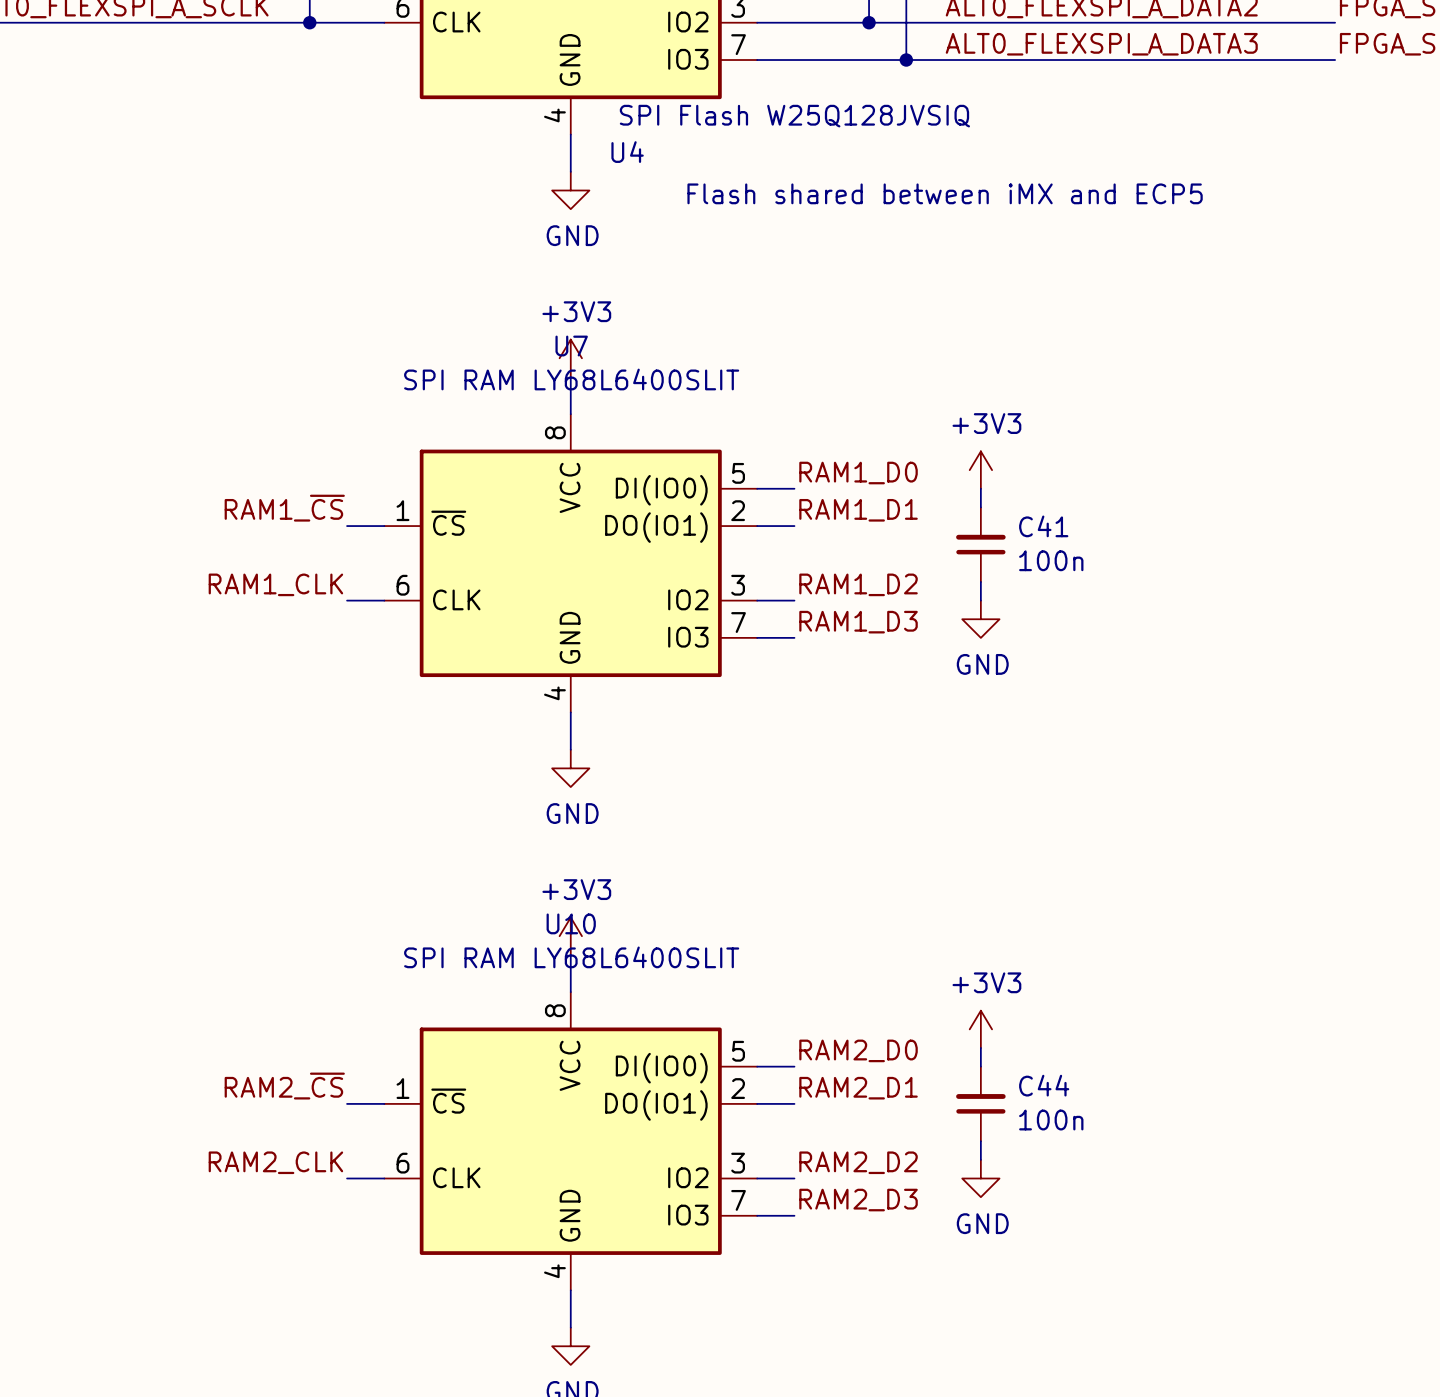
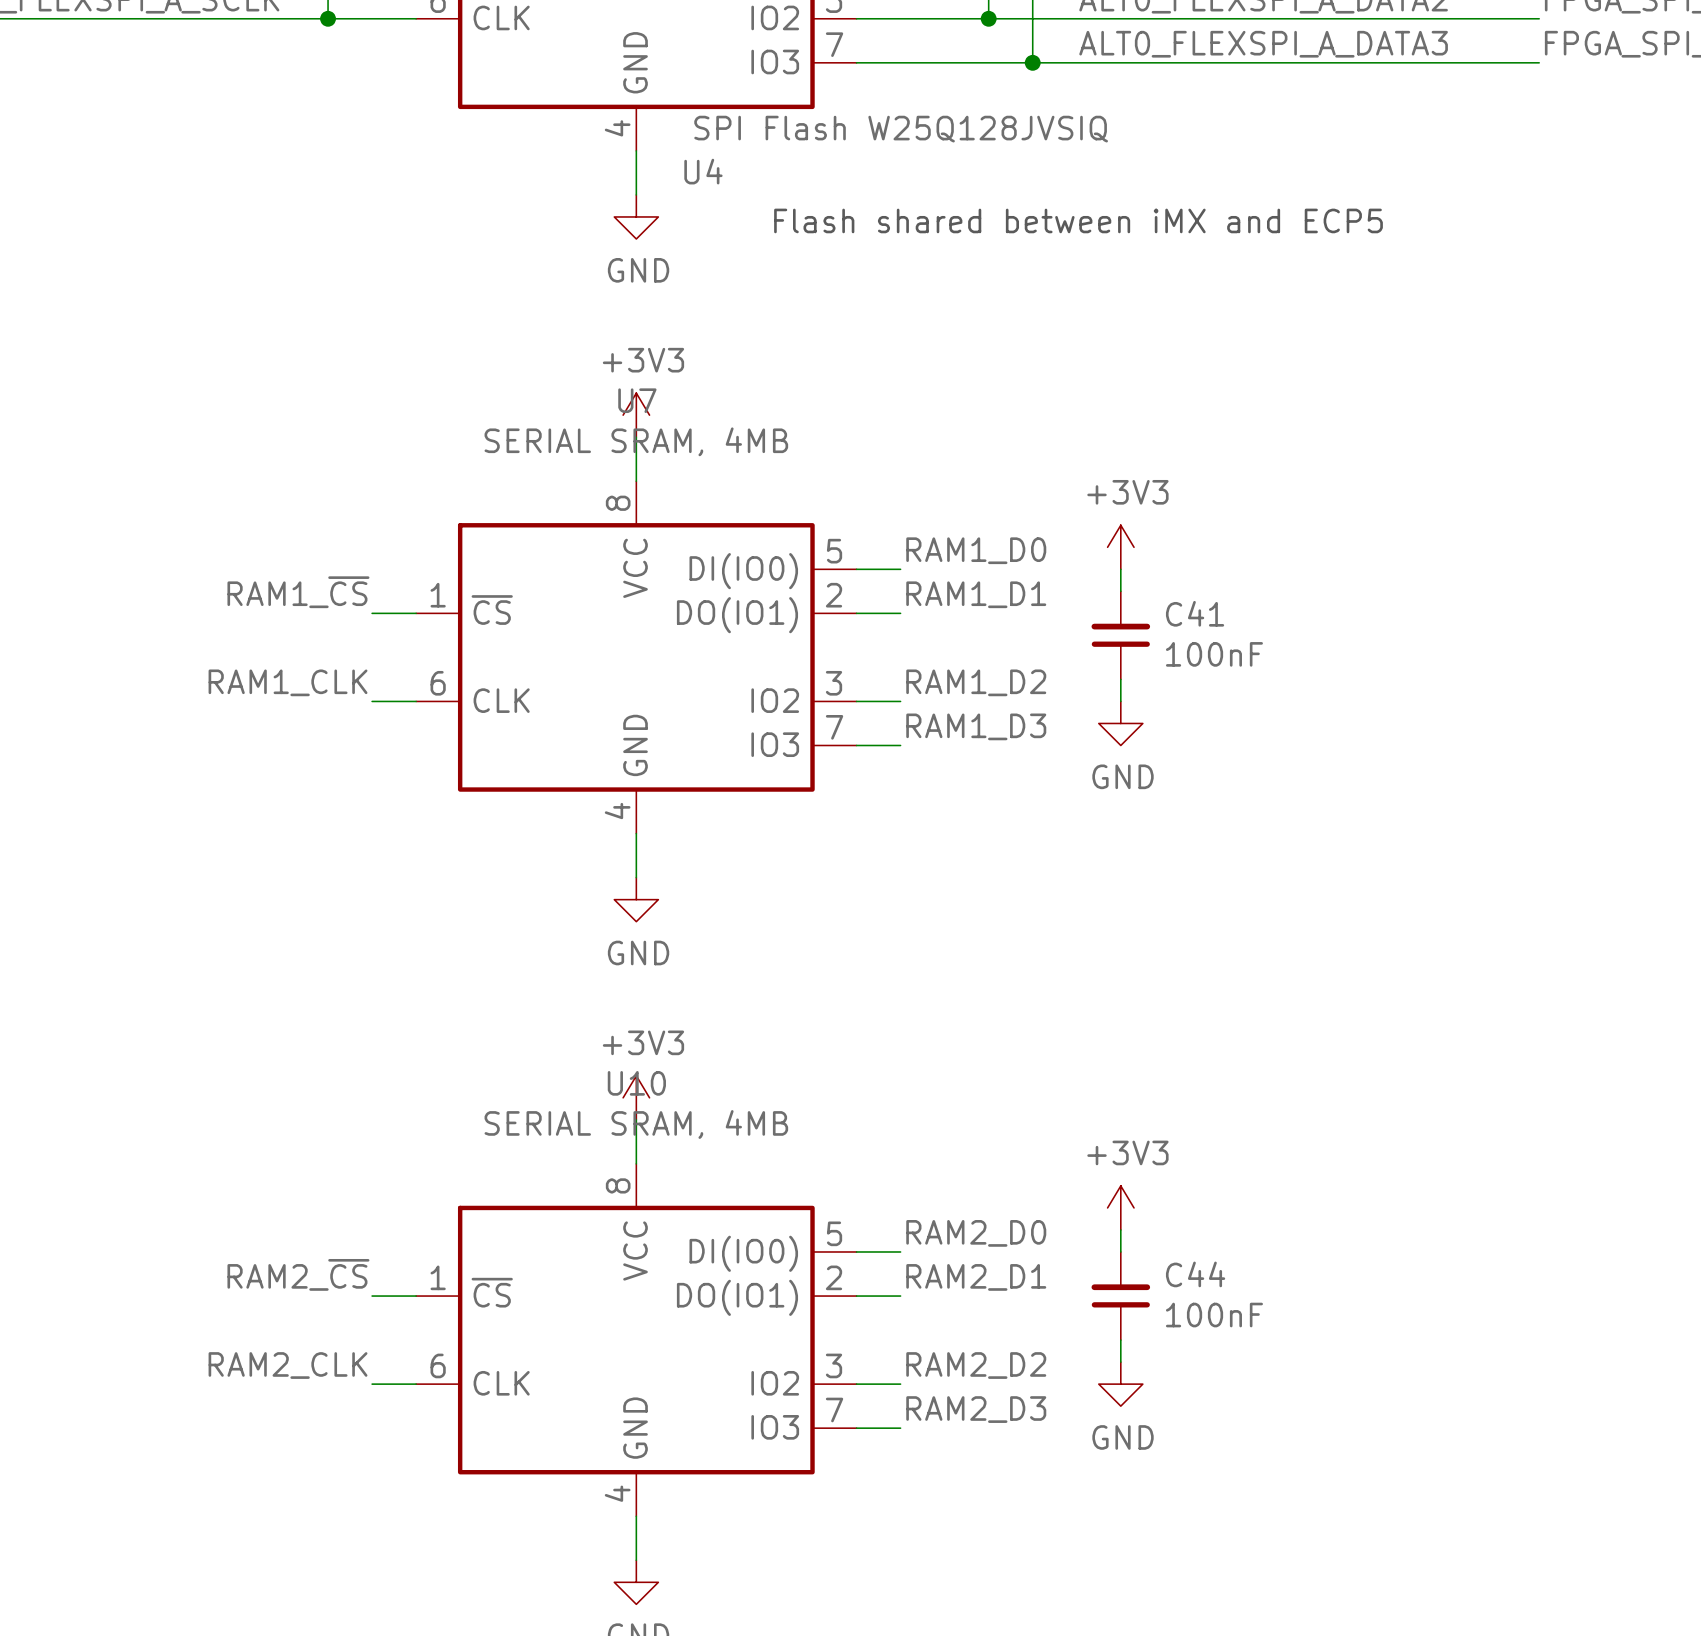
U7 value: SPI RAM LY68L6400SLIT (571, 379) -> SERIAL SRAM, 4MB (636, 441)
C41 value: 100n (1051, 560) -> 100nF (1214, 654)
U10 value: SPI RAM LY68L6400SLIT (571, 957) -> SERIAL SRAM, 4MB (636, 1124)
C44 value: 100n (1051, 1120) -> 100nF (1214, 1315)

